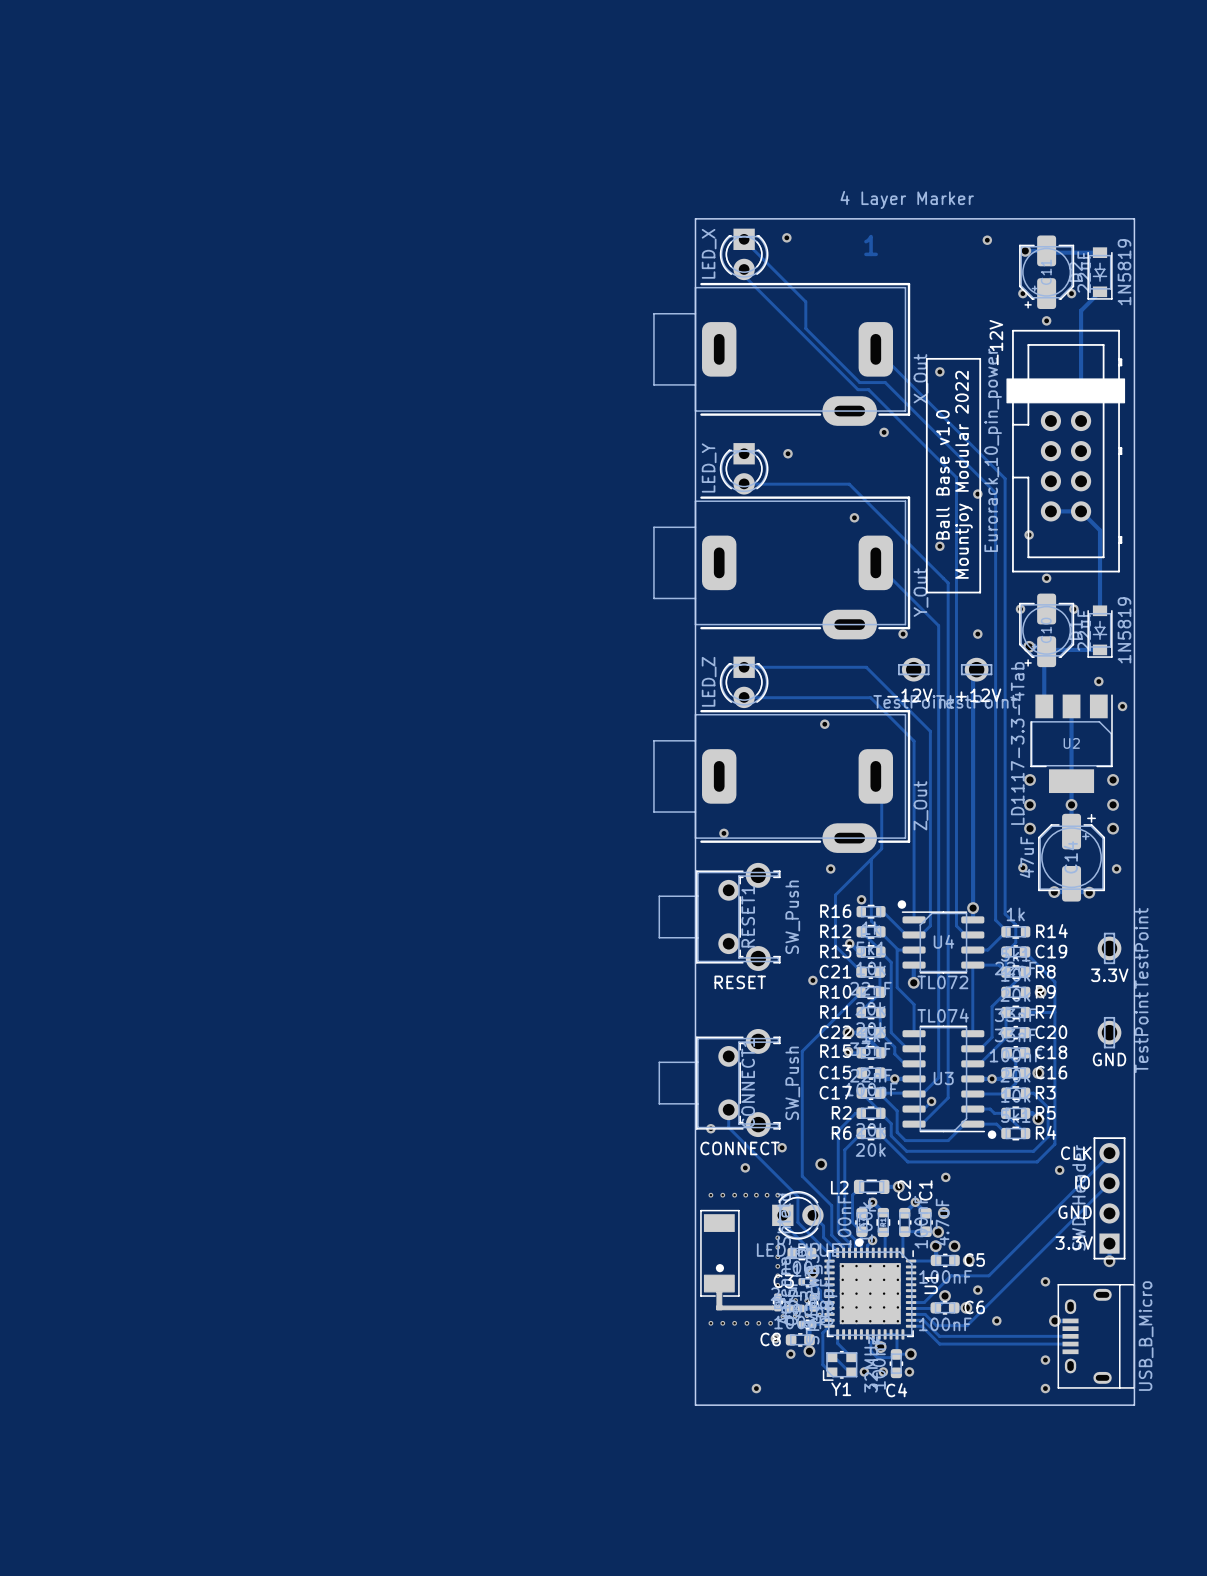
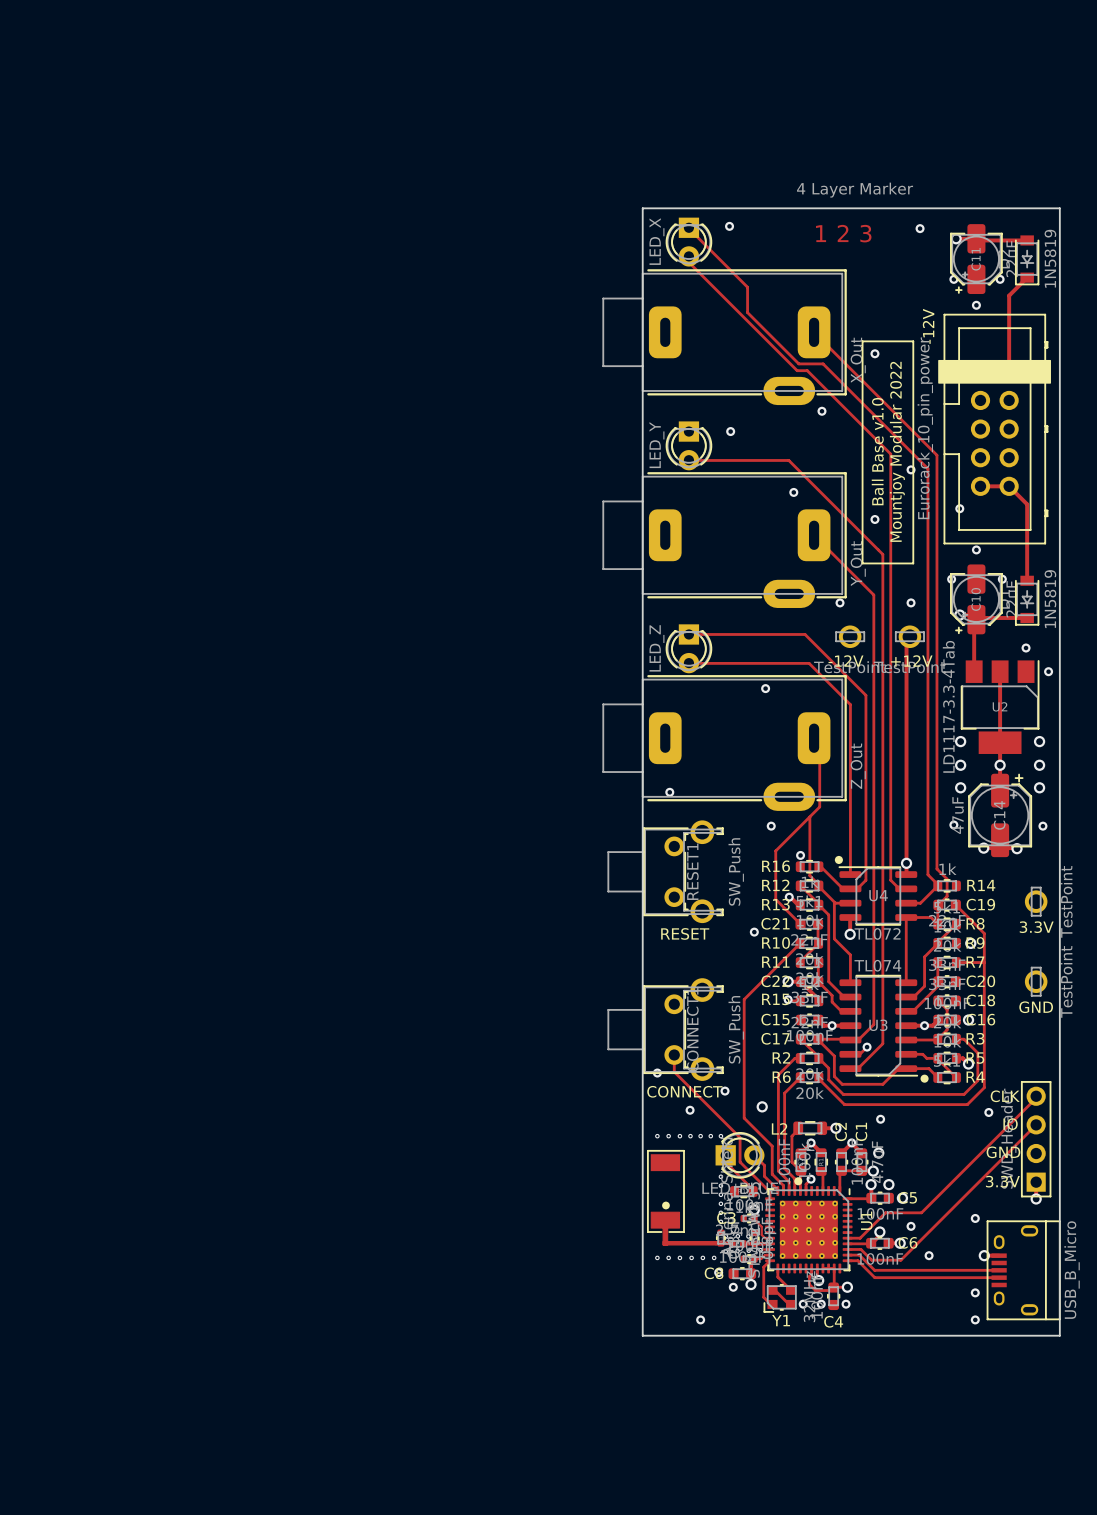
drawing shape: [840, 190, 974, 257] -> [797, 182, 914, 243]

